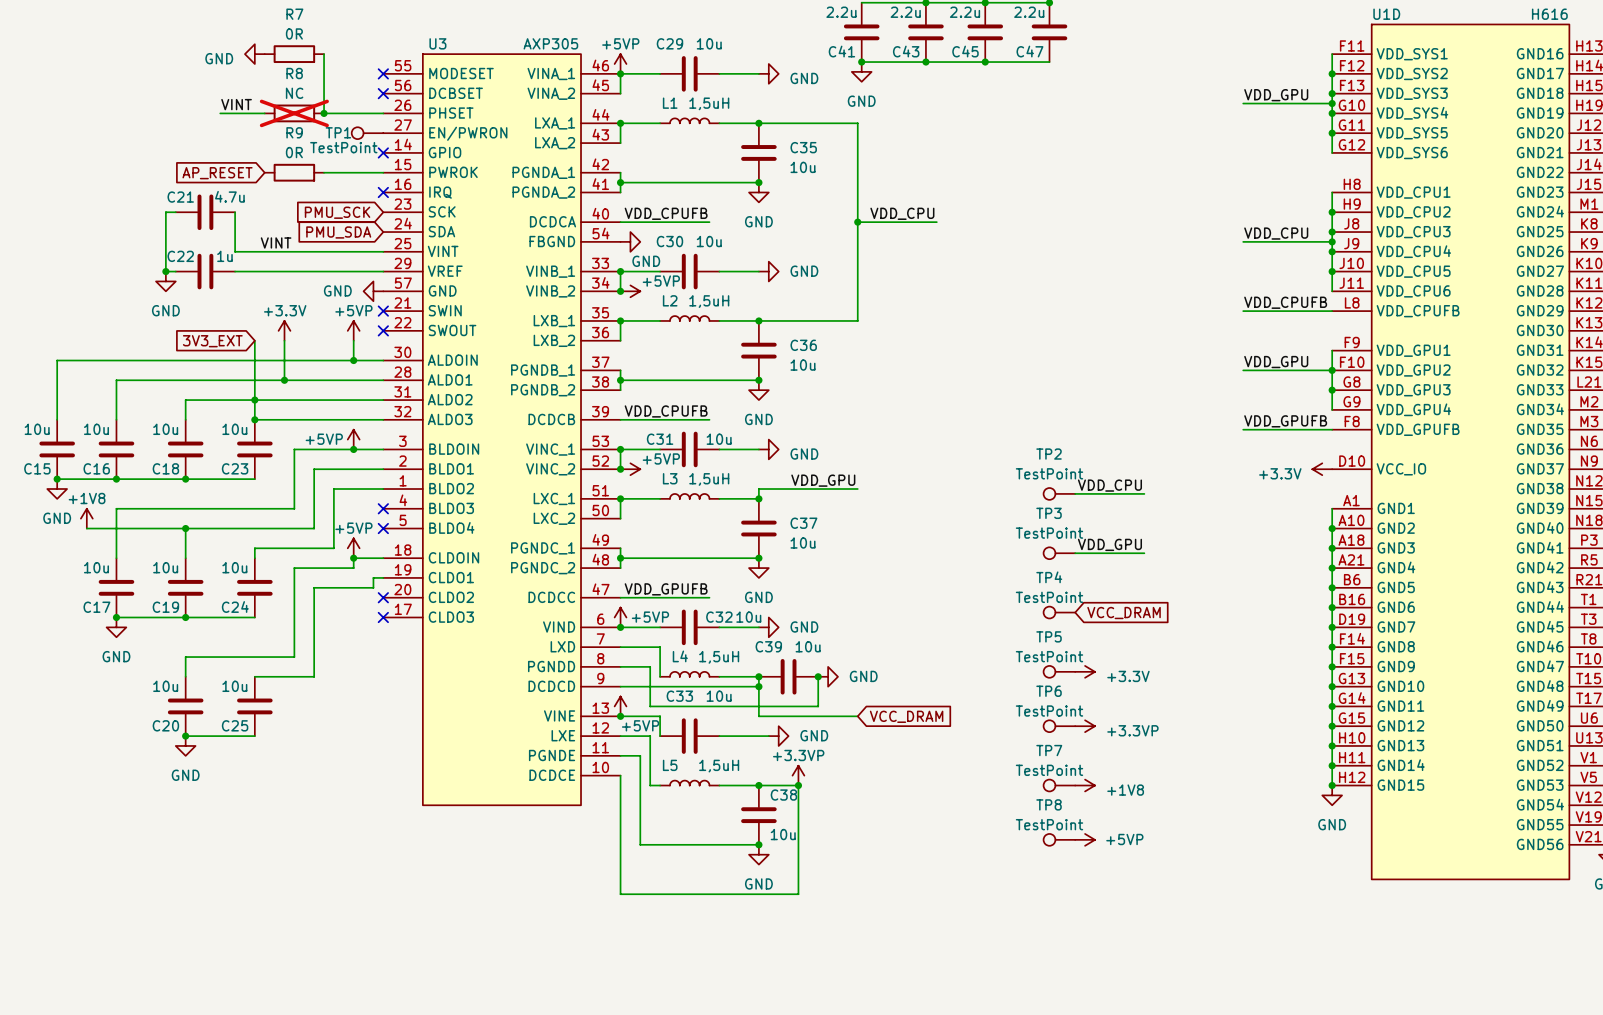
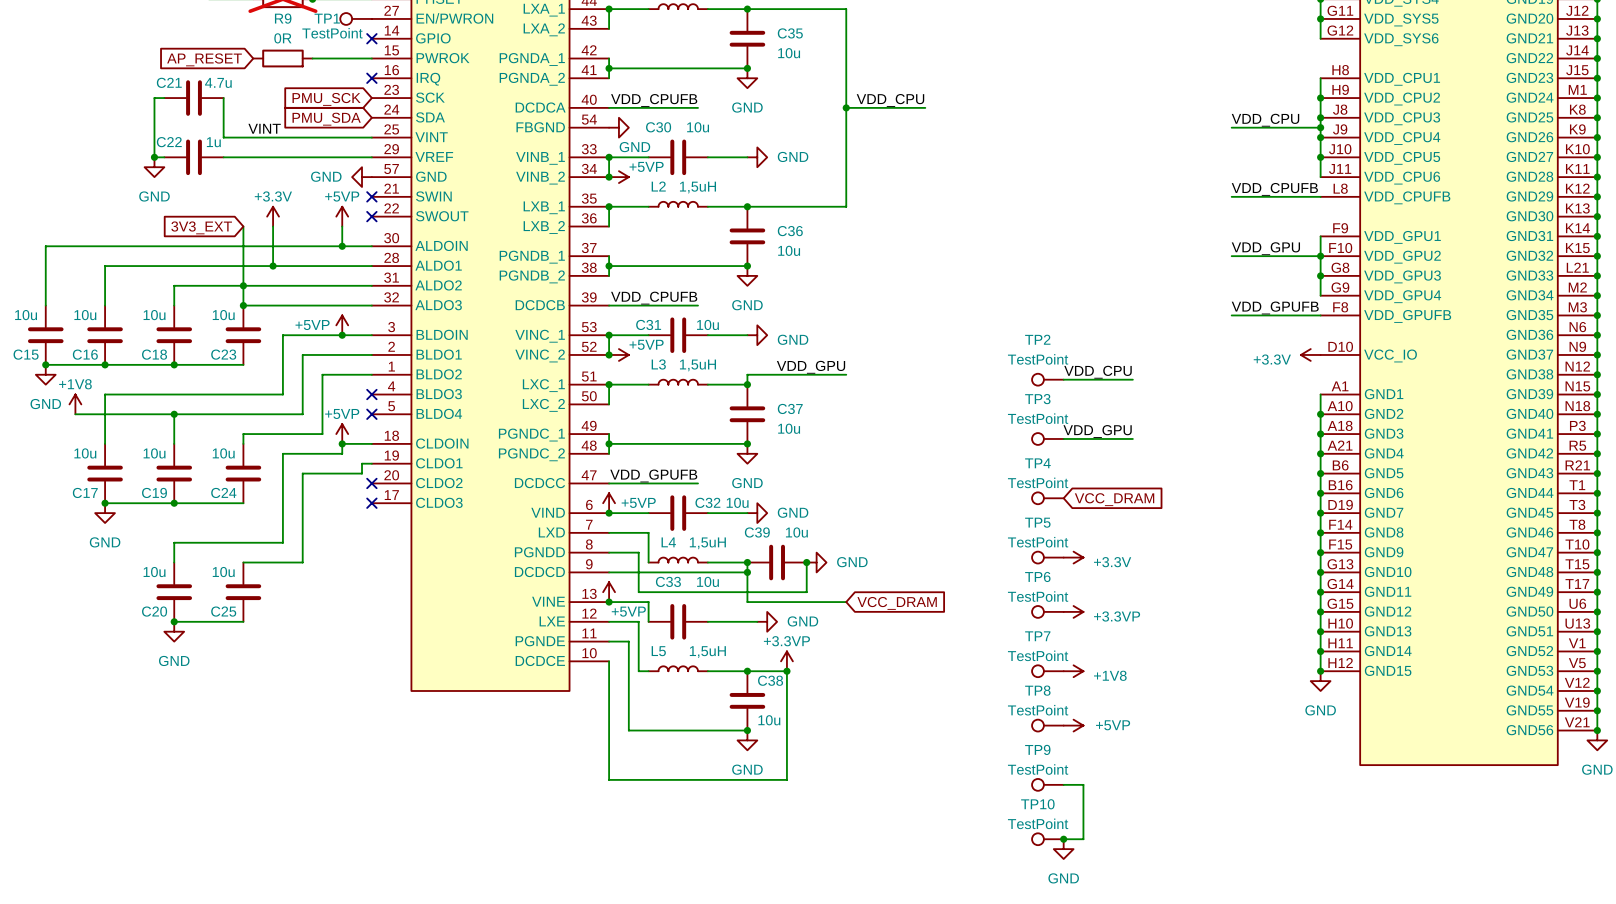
TP9: none -> TestPoint (1047, 784)
wire: none -> (1063, 784) (1083, 784) (1083, 839) (1063, 839)
TP10: none -> TestPoint (1047, 839)
junction: none -> (1063, 839)
power symbol: none -> GND (1063, 849)

